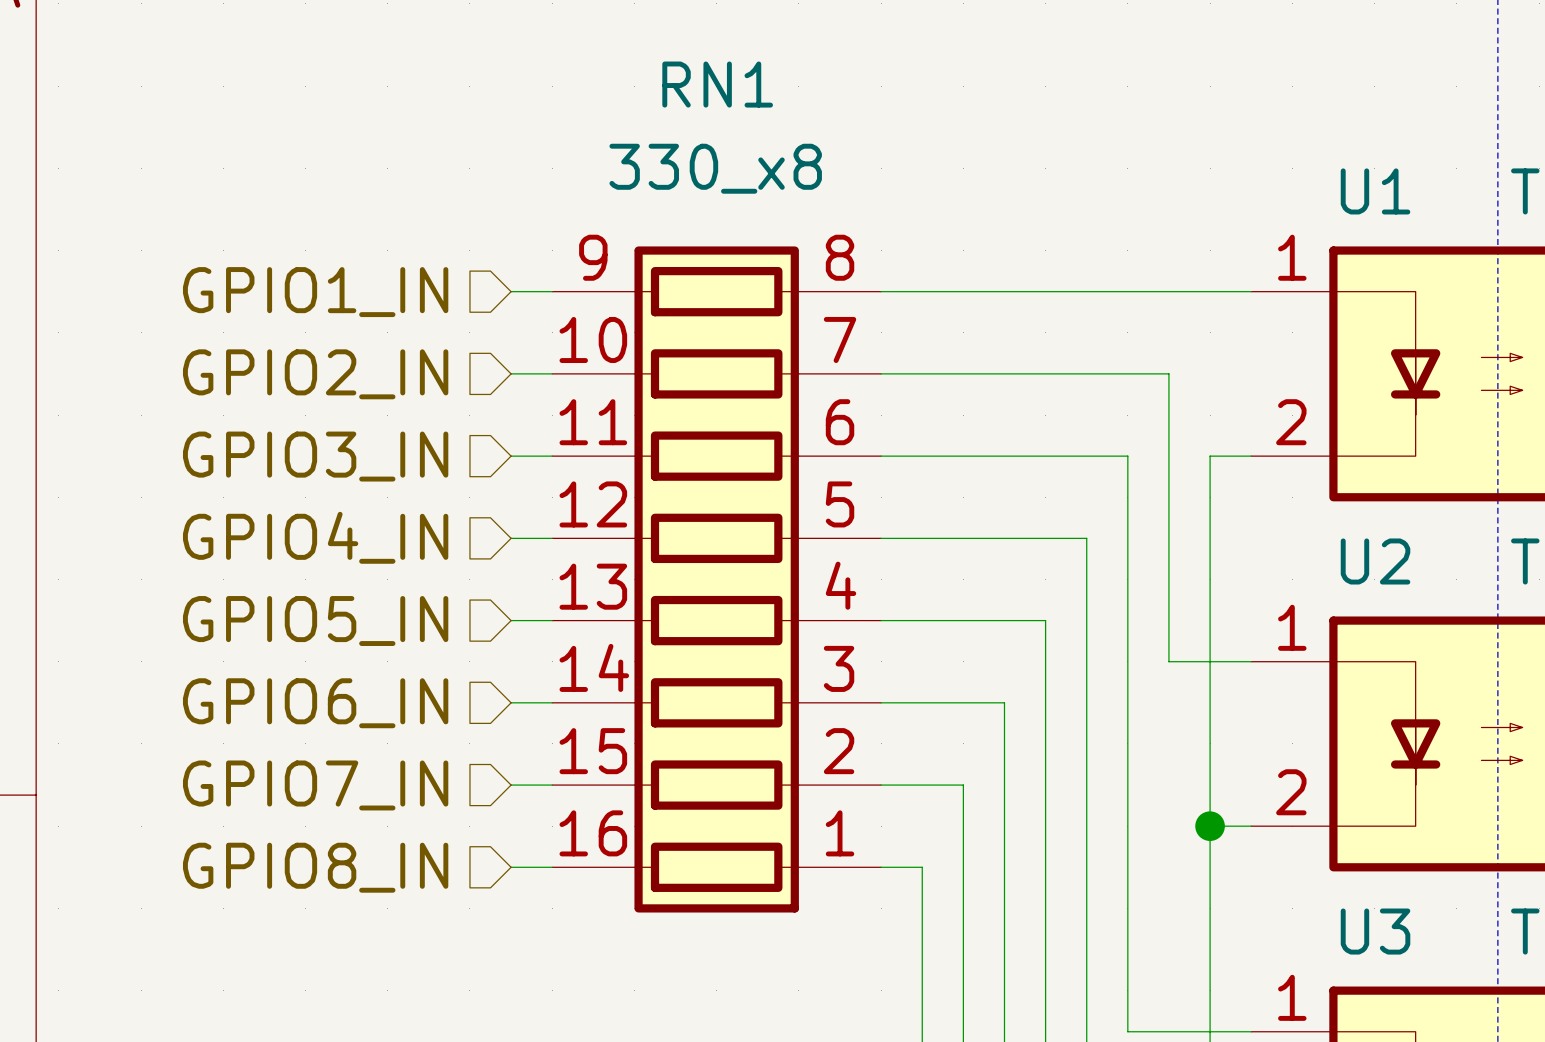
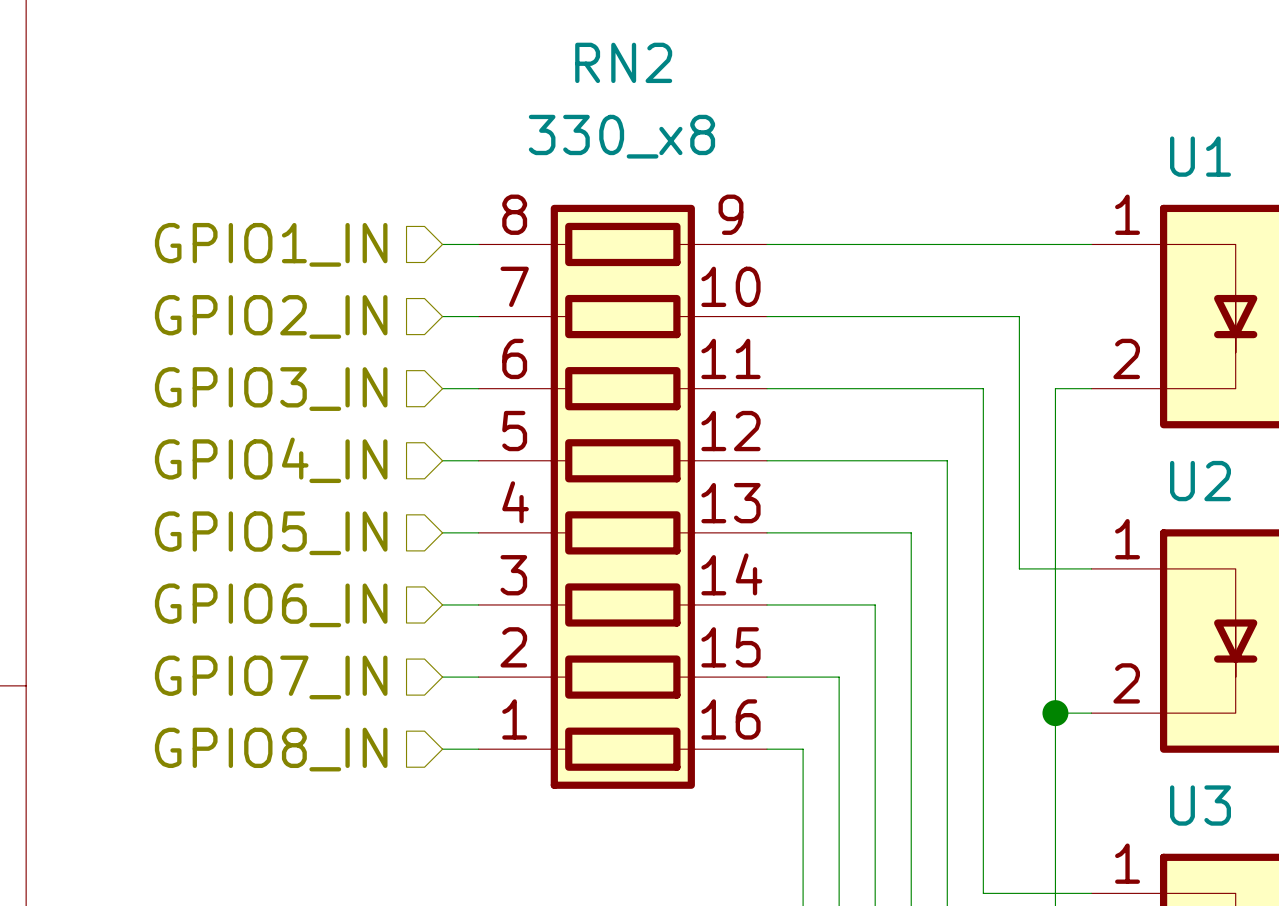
RN1 name: RN1 (717, 84) -> RN2 (623, 62)
RN1 flip: as is (716, 579) -> left-right (622, 496)

